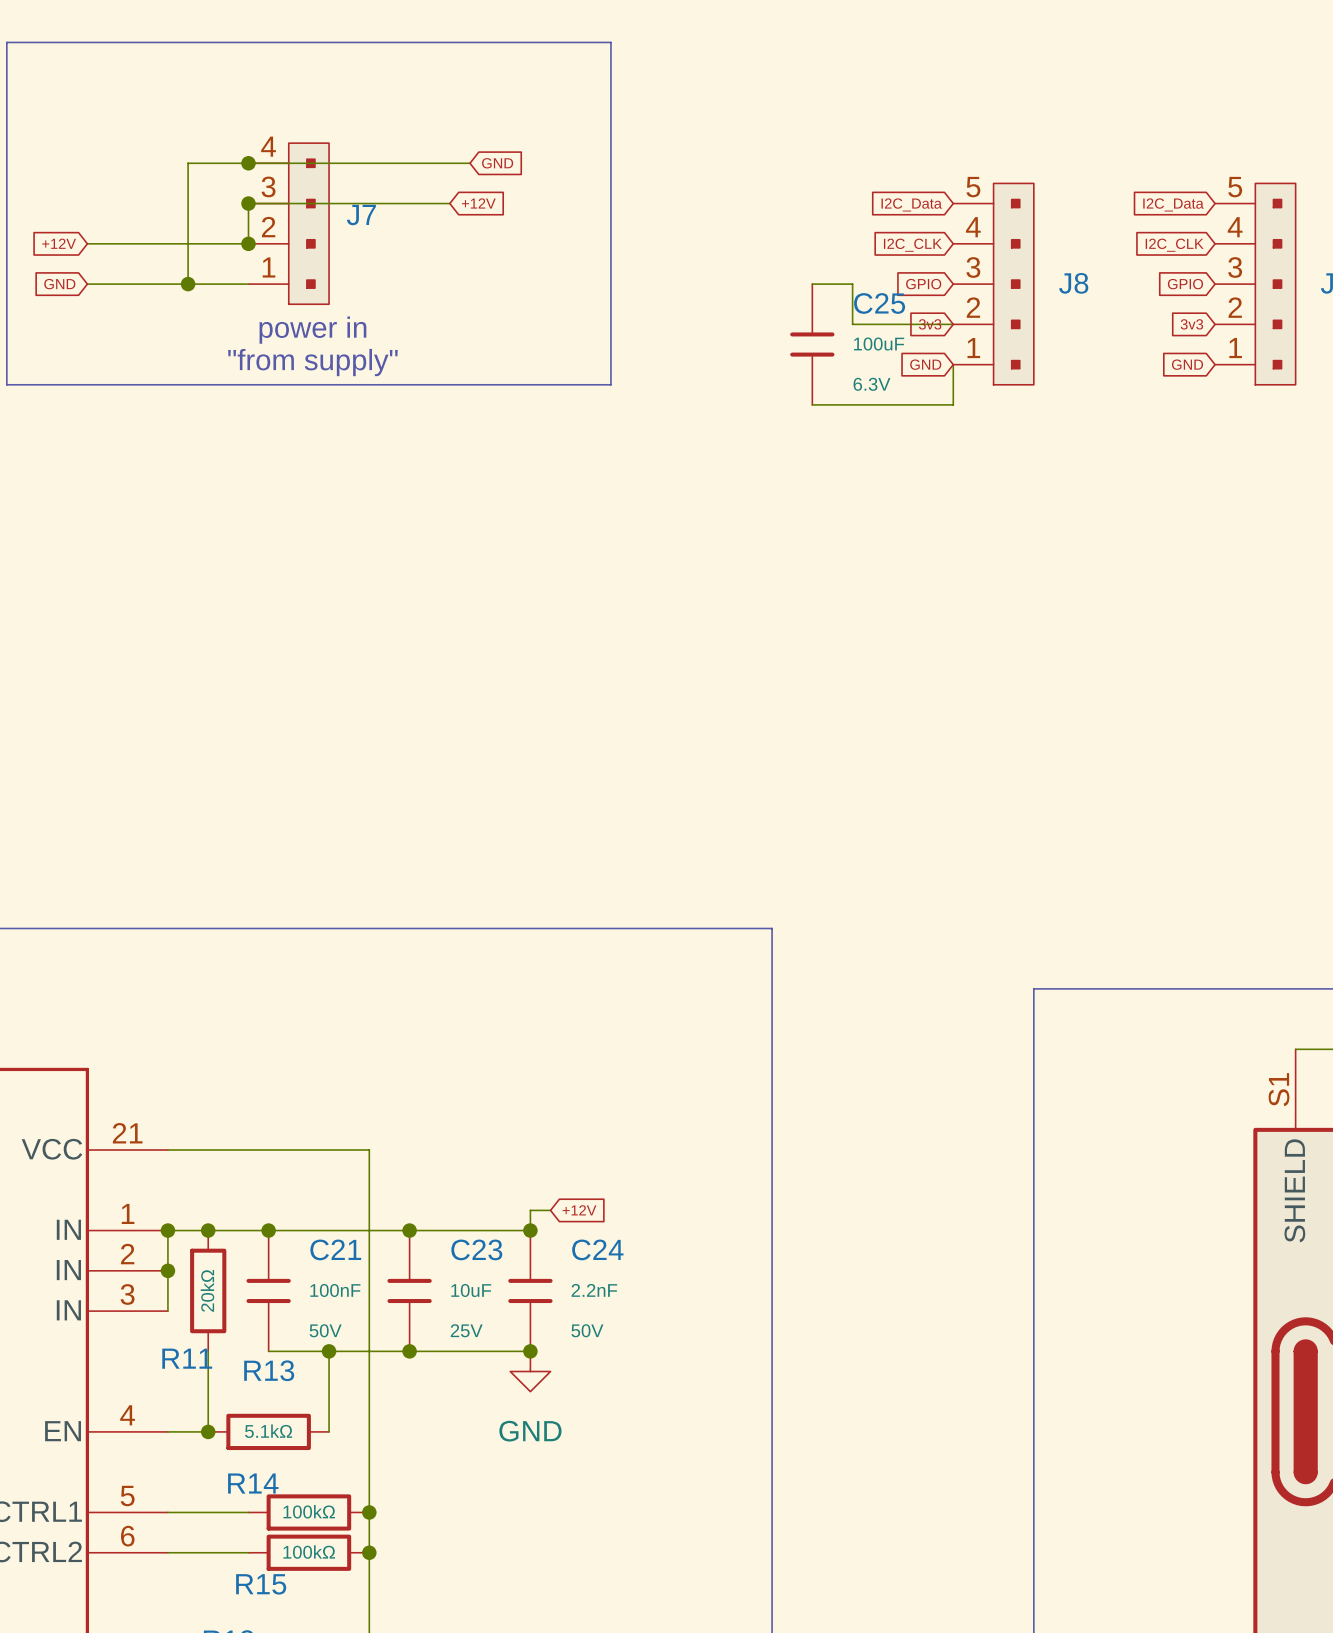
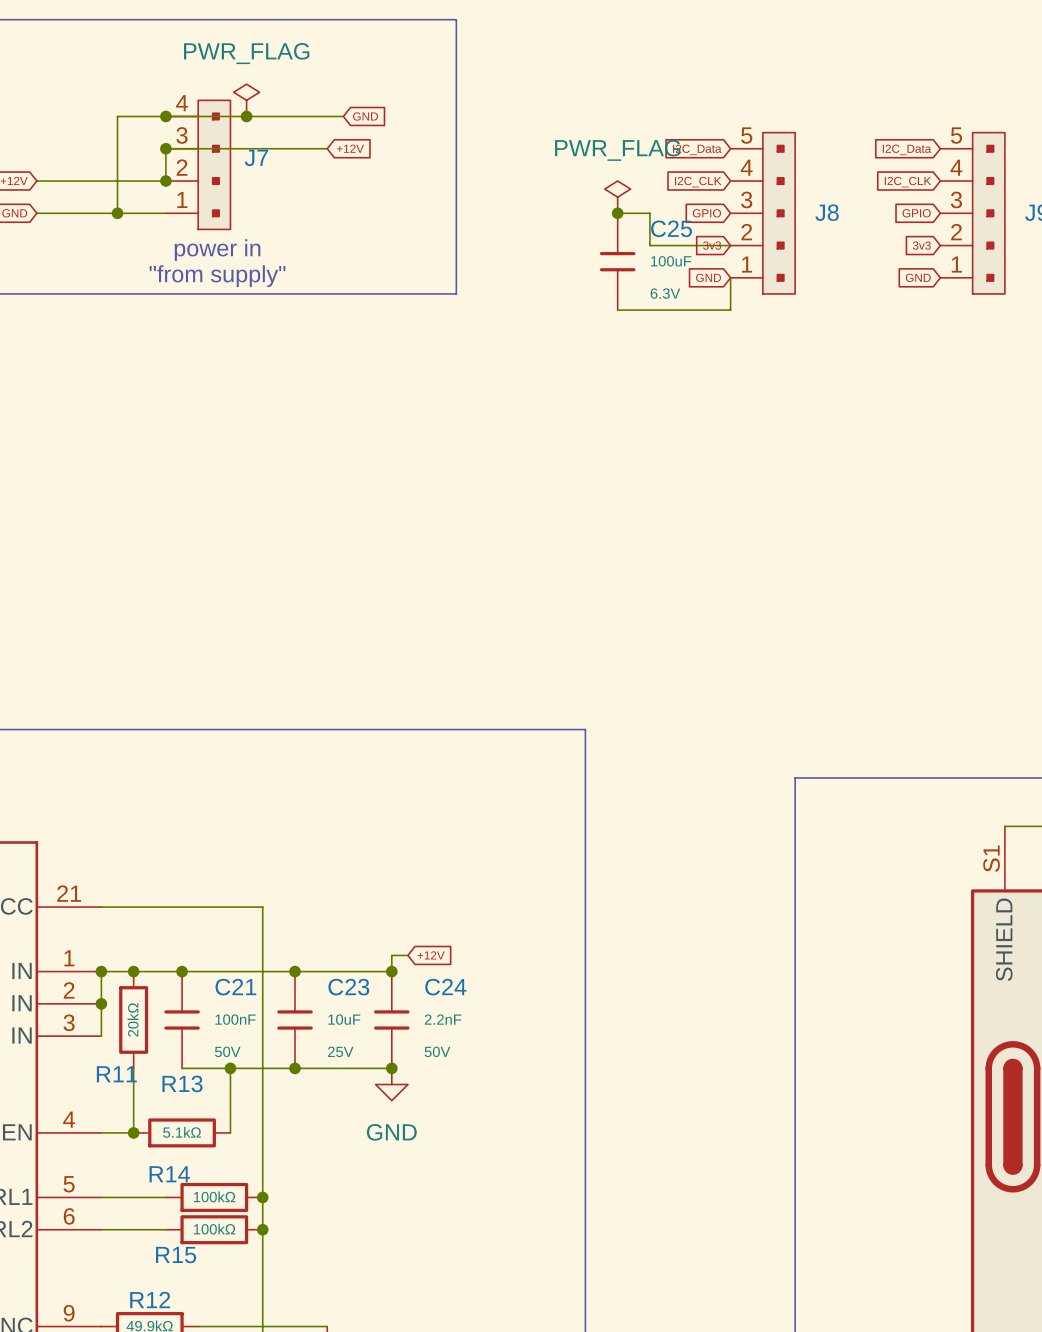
power symbol: none -> PWR_FLAG (246, 100)
junction: none -> (246, 116)
power symbol: none -> PWR_FLAG (617, 197)
junction: none -> (617, 213)

